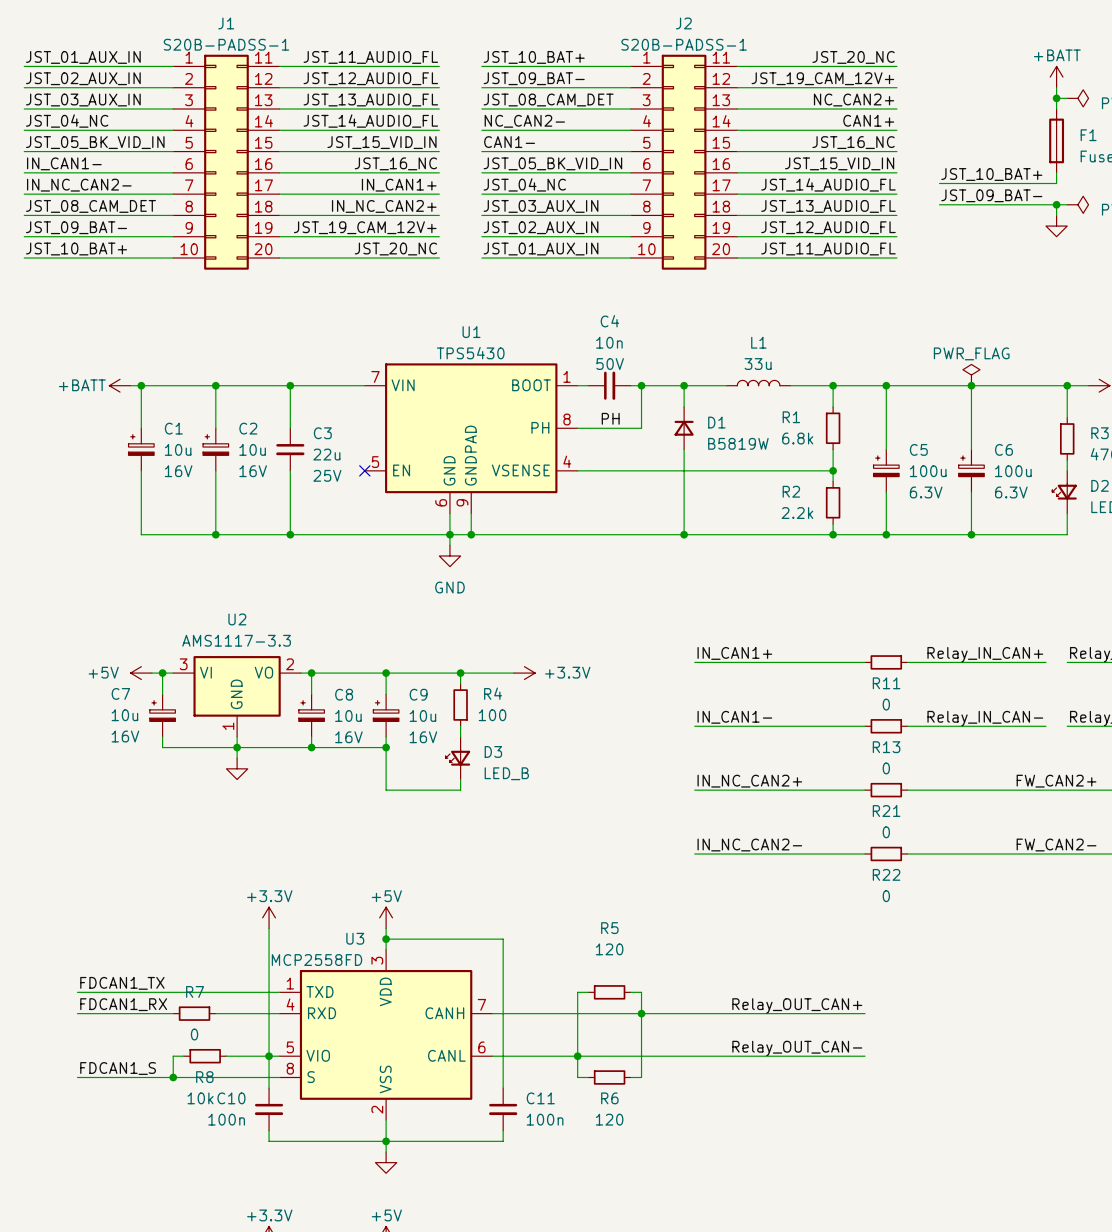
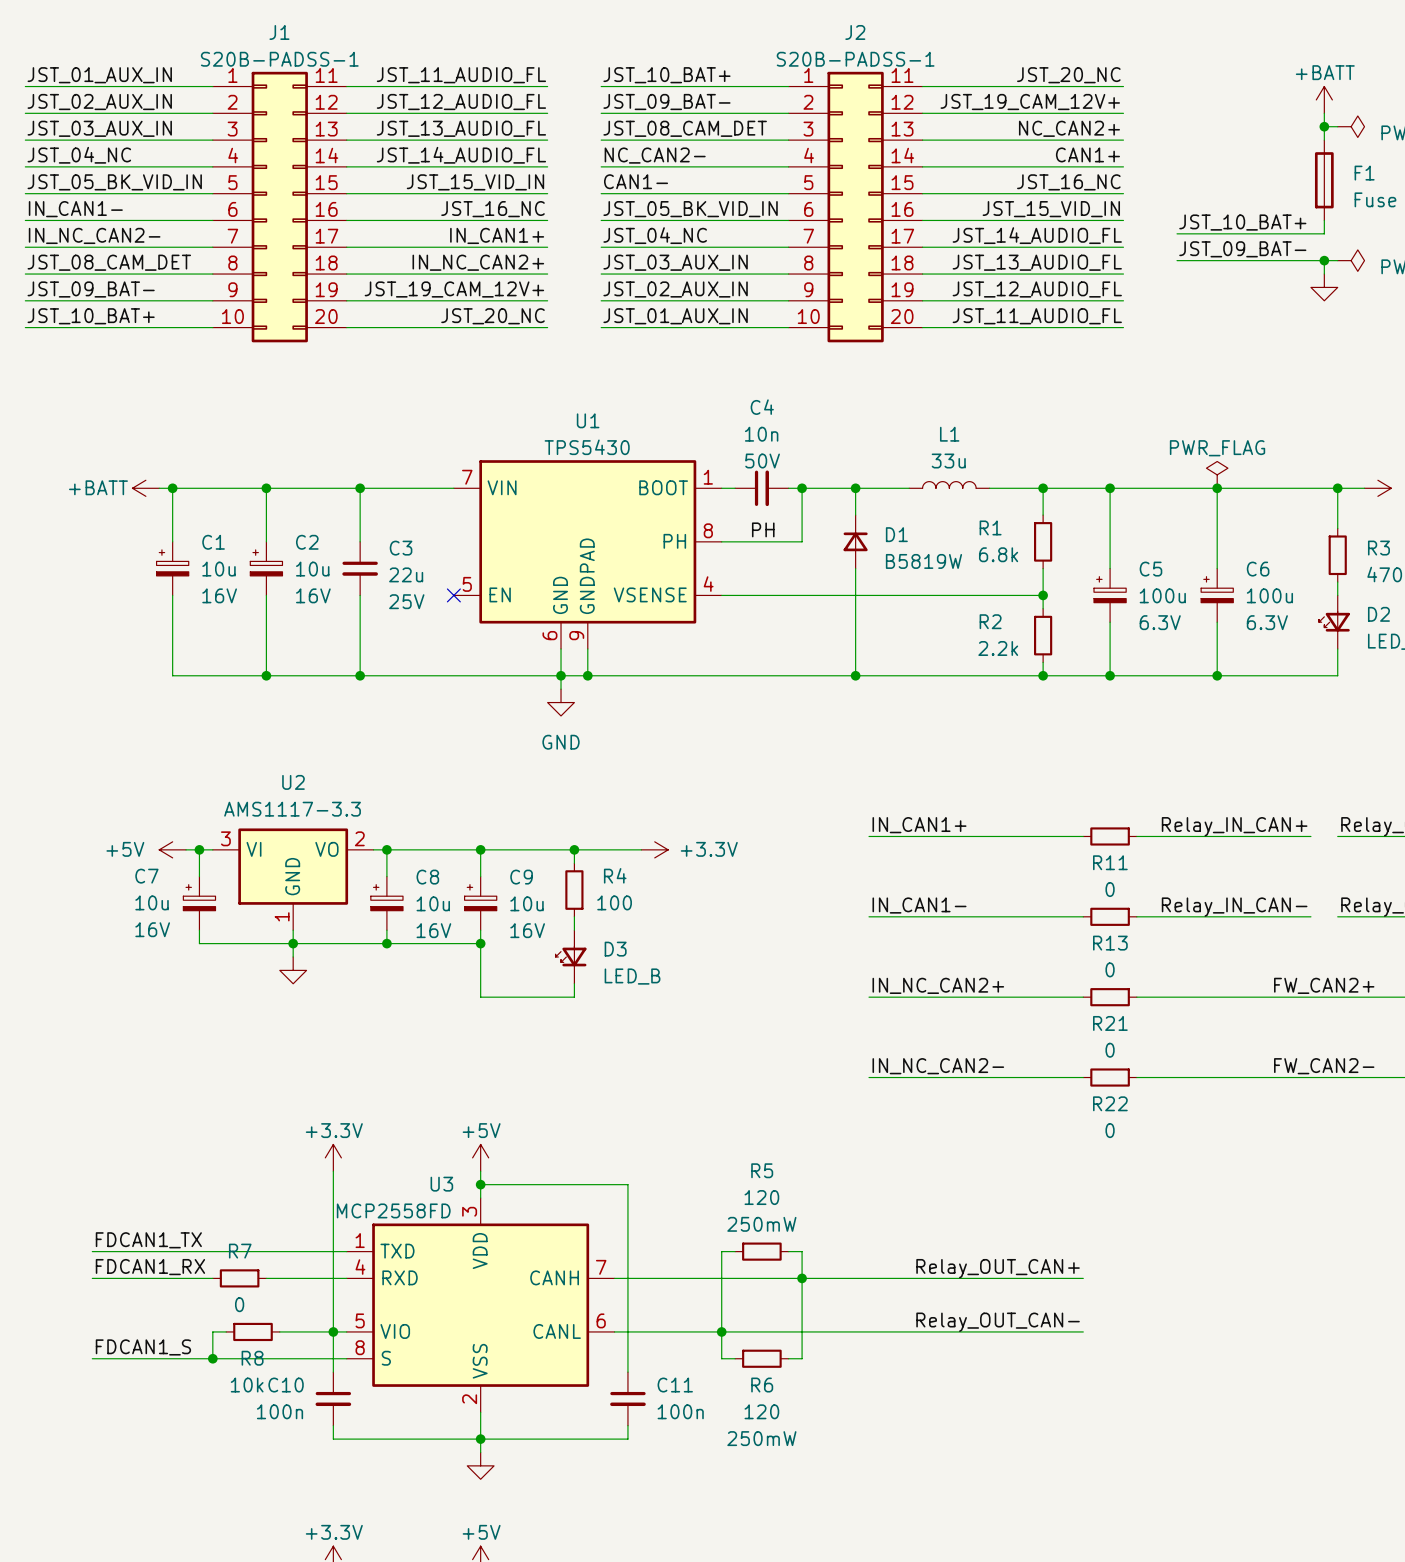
R5 text: none -> 250mW (761, 1224)
R6 text: none -> 250mW (761, 1438)

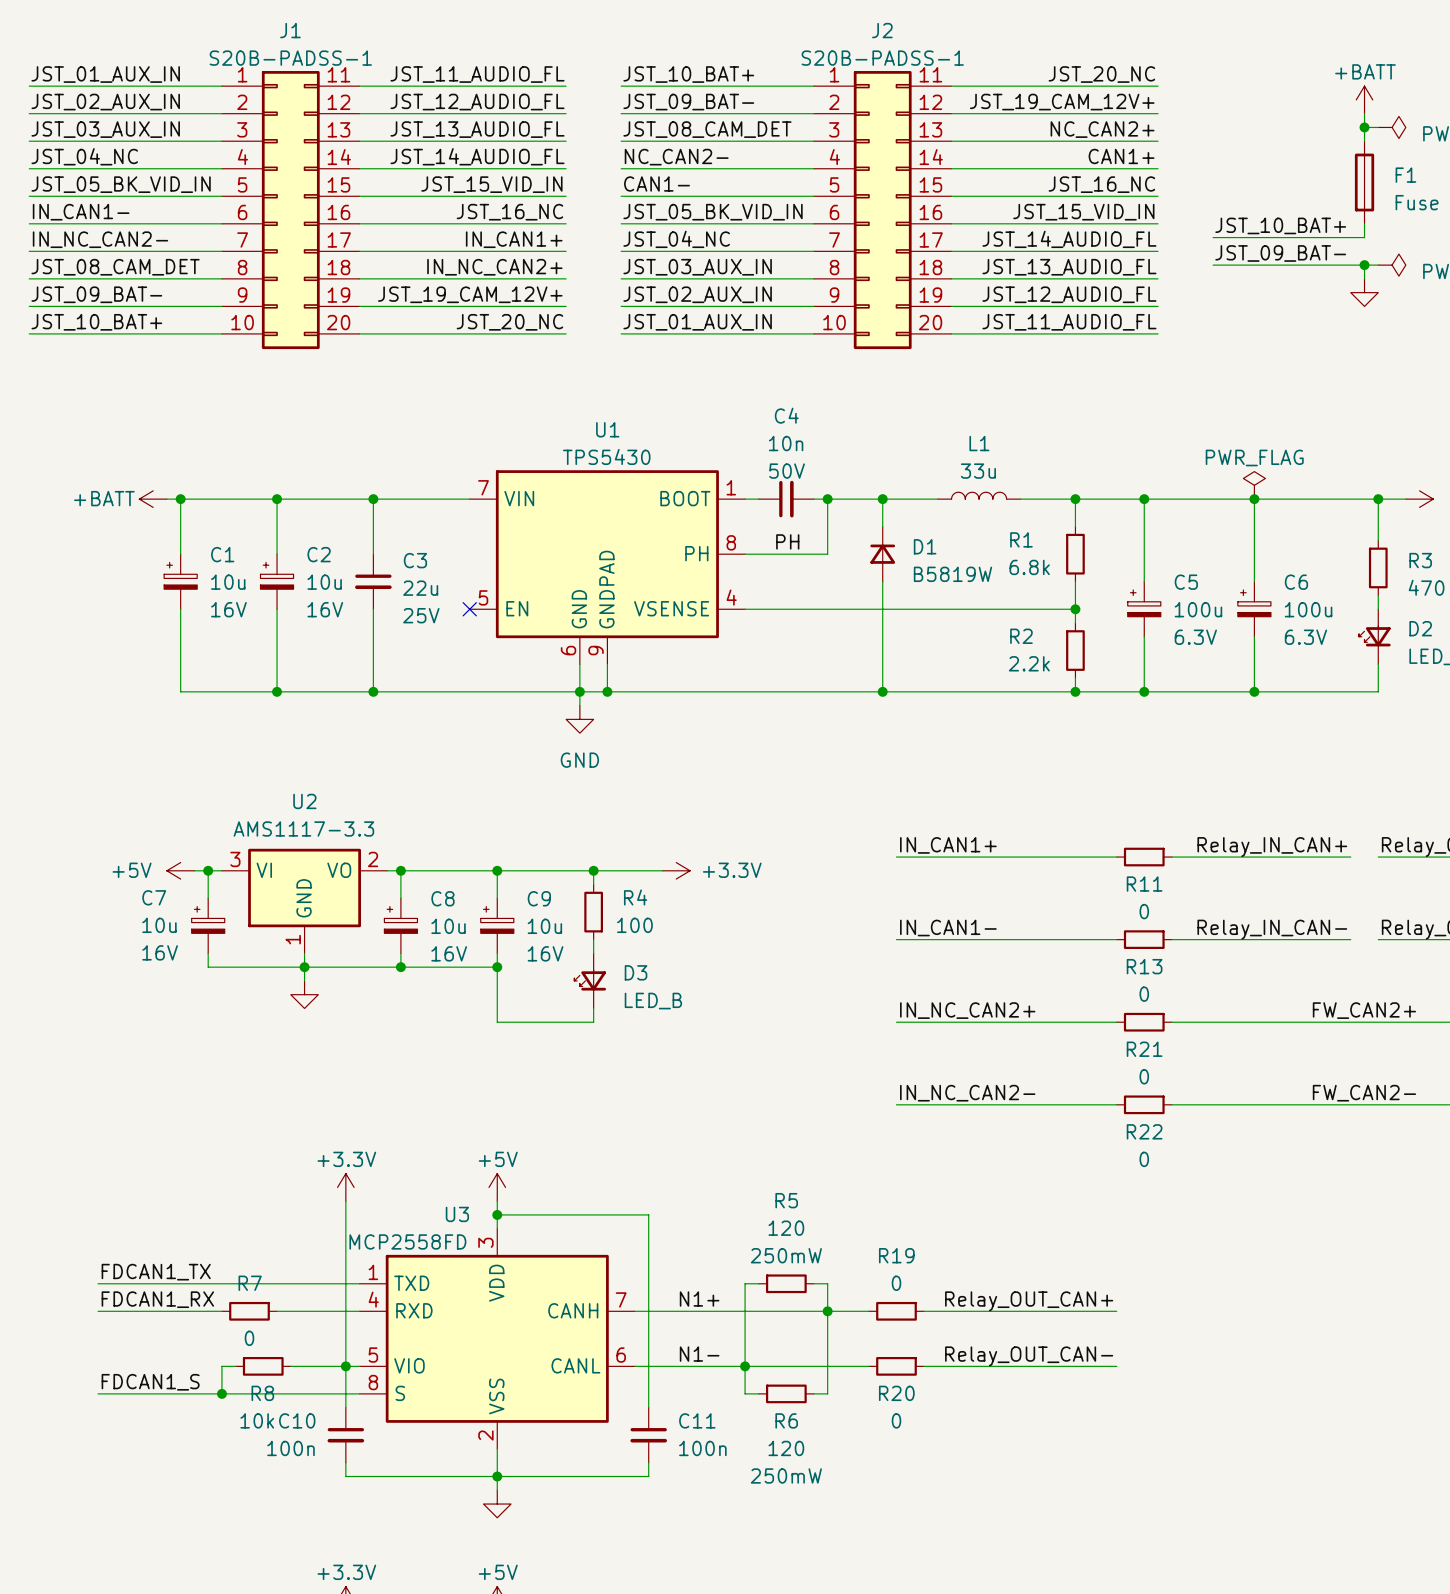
label: none -> N1+ (699, 1299)
wire: (842, 1278) (895, 1278) -> none
R19: none -> 0 (896, 1311)
label: none -> N1- (699, 1354)
wire: (842, 1331) (895, 1331) -> none
R20: none -> 0 (896, 1366)

